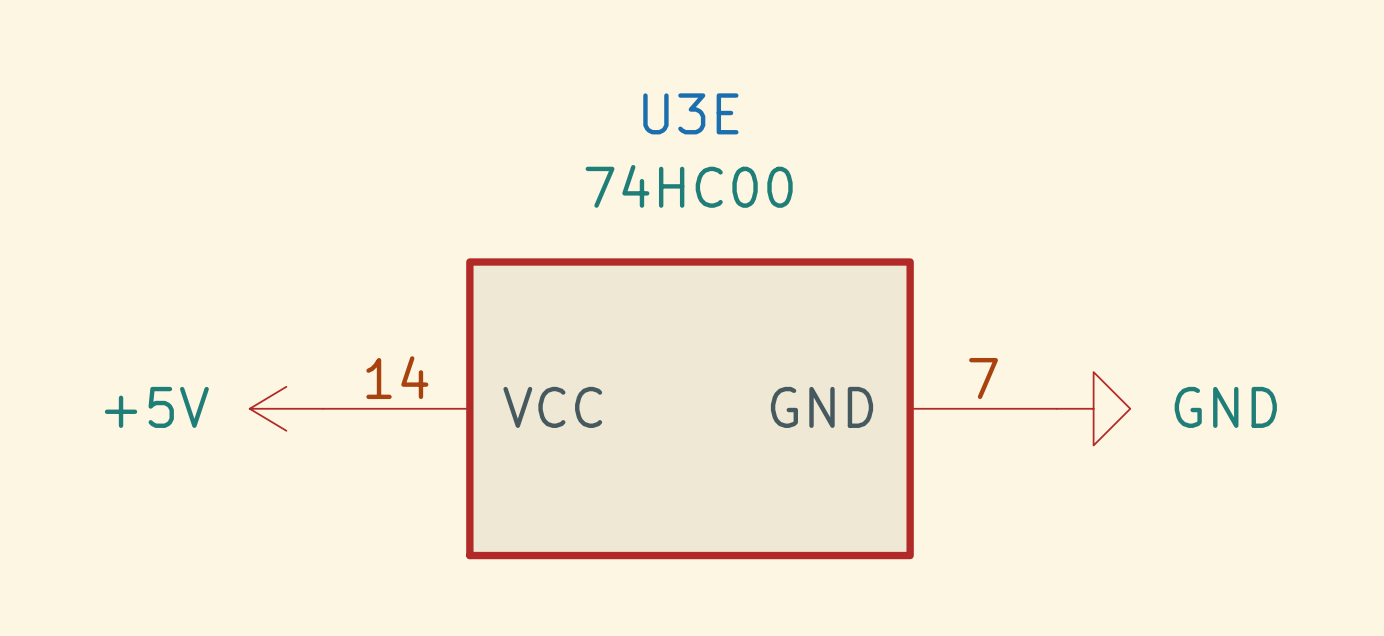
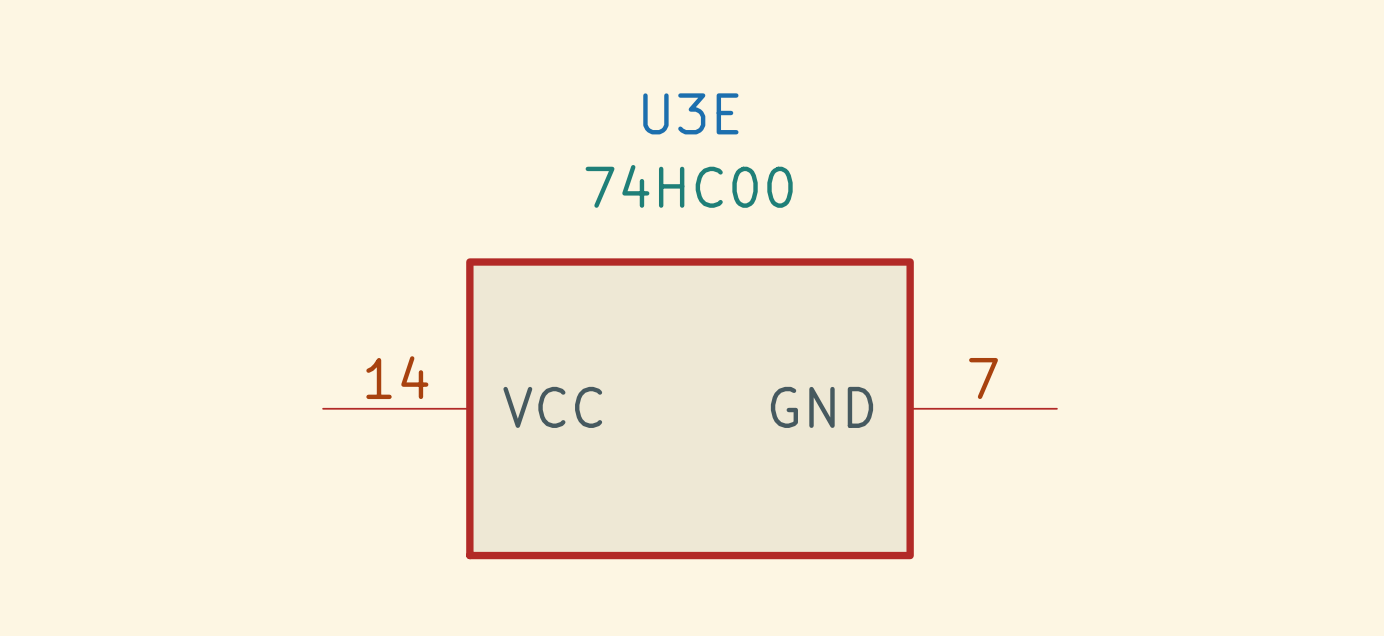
power symbol: +5V (286, 408) -> none
power symbol: GND (1093, 408) -> none

